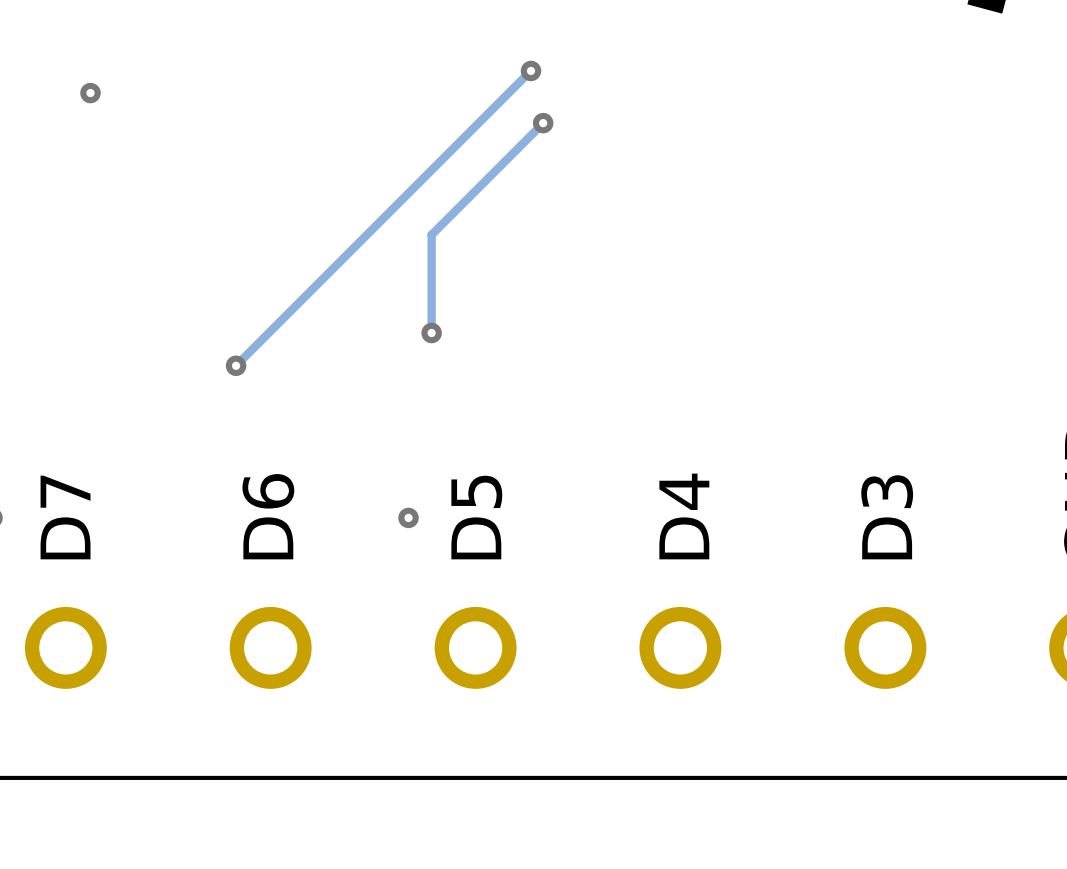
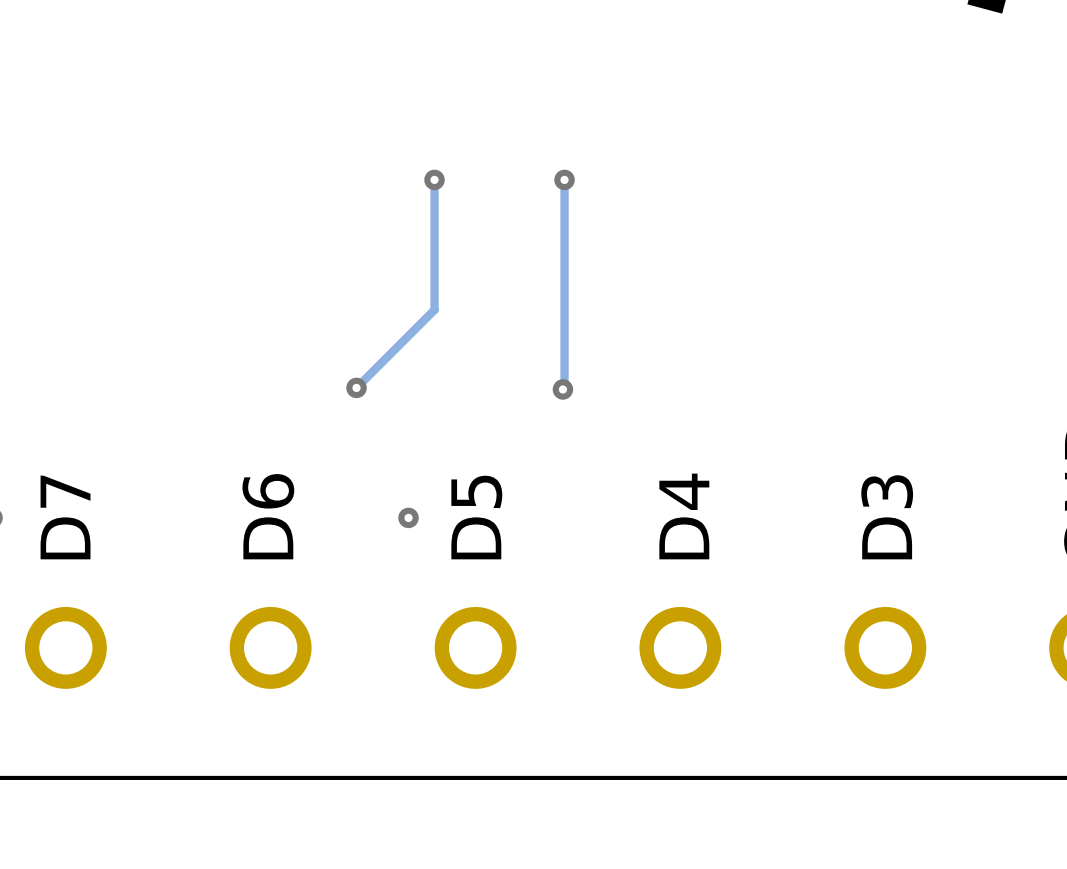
track: (530, 70) (236, 365) -> none
via: (530, 70) -> none
via: (90, 93) -> none
track: (543, 123) (431, 234) (431, 333) -> none
via: (543, 123) -> none
track: none -> (434, 179) (434, 309) (356, 387)
via: none -> (434, 179)
track: none -> (564, 179) (564, 387) (562, 389)
via: none -> (564, 179)
via: (431, 333) -> none
via: (236, 365) -> none
via: none -> (356, 387)
via: none -> (562, 389)

